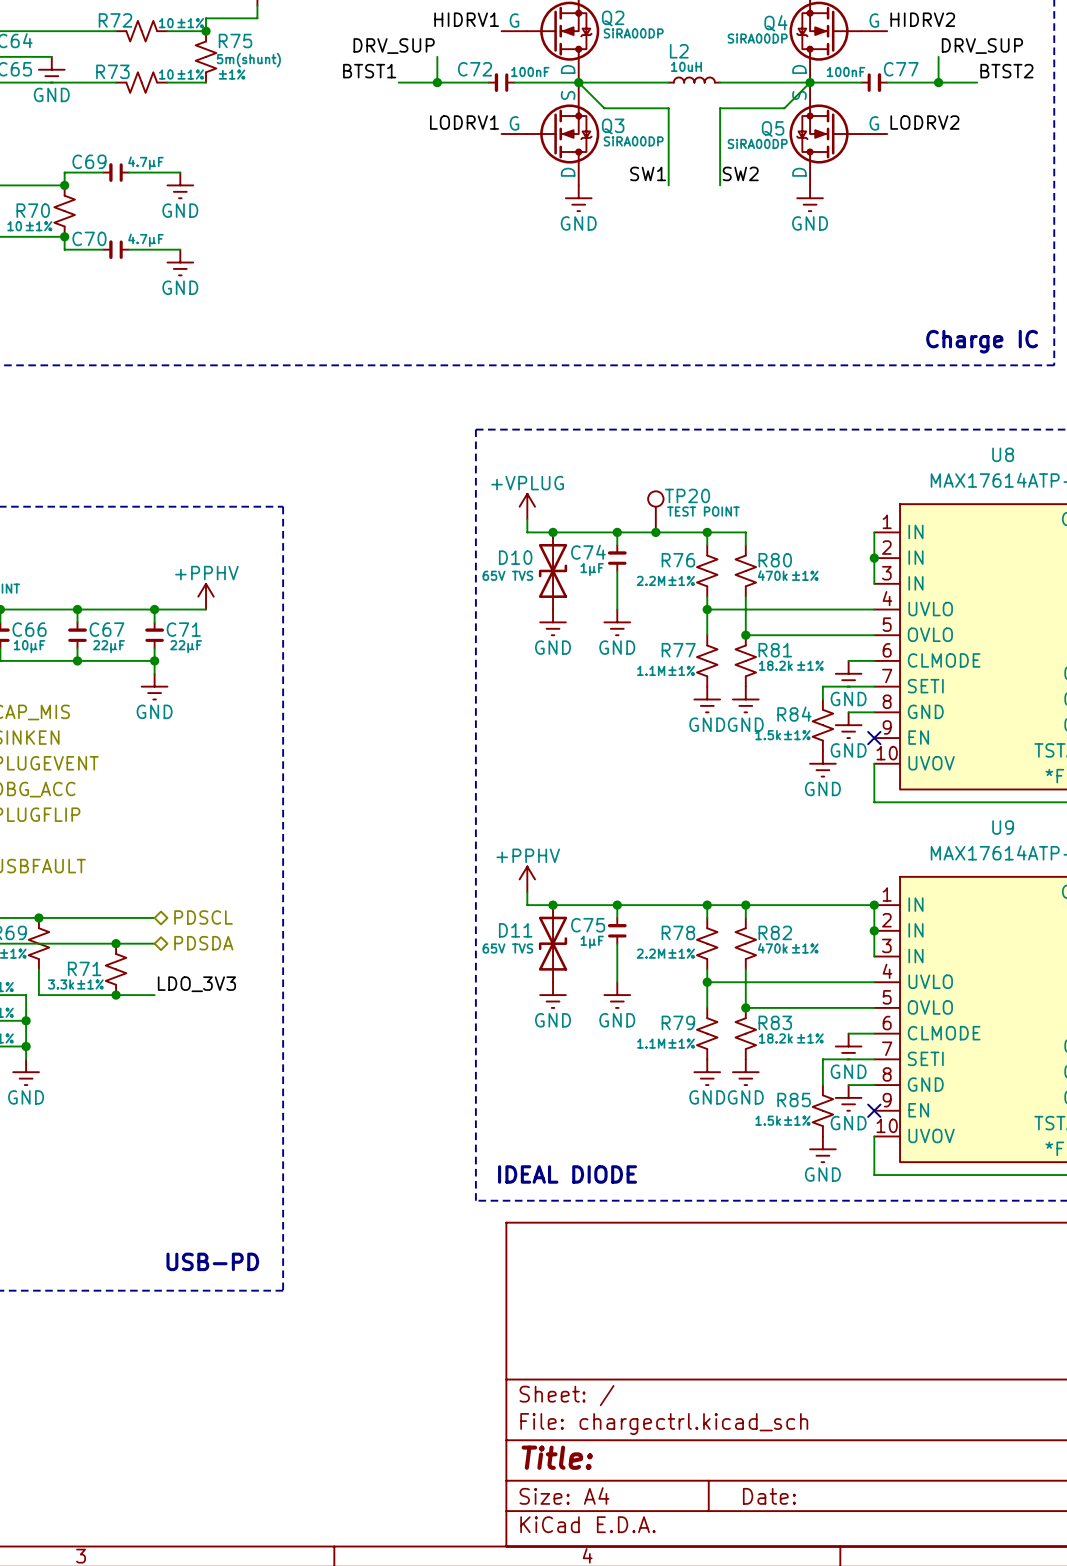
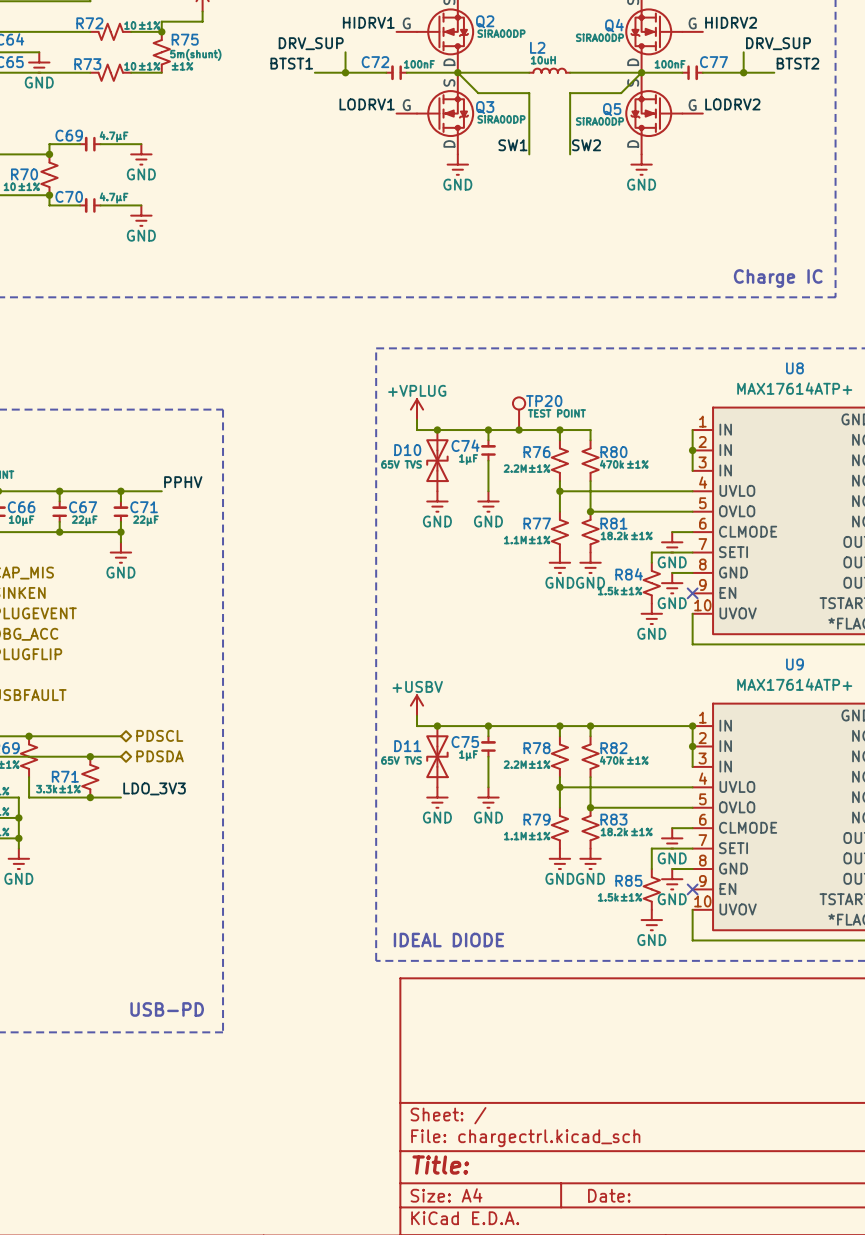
power symbol: +PPHV (206, 596) -> none
label: none -> PPHV (183, 482)
power symbol: +PPHV (527, 879) -> +USBV (416, 705)

